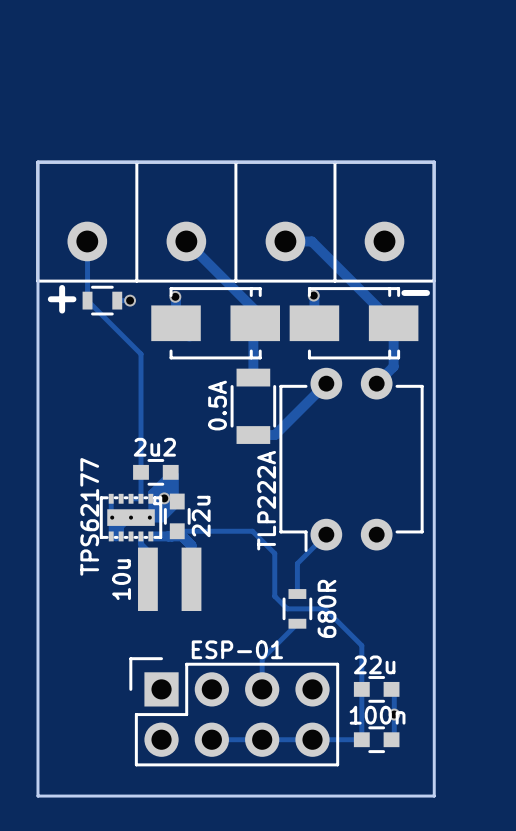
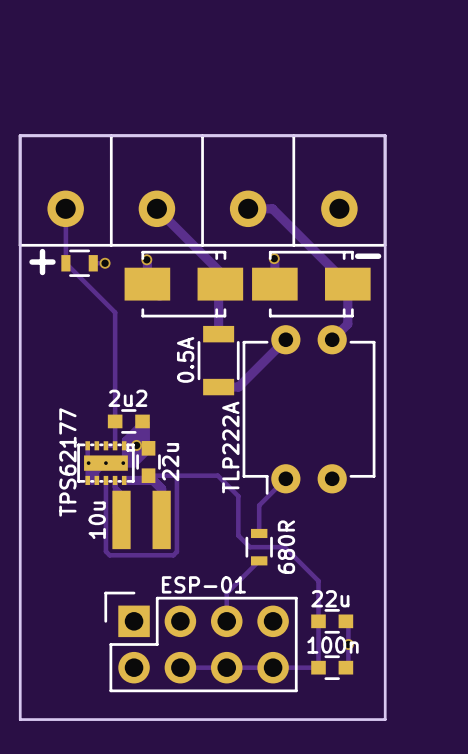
track: none -> (176, 475) (176, 551) (173, 555) (109, 555) (105, 551) (105, 480)

